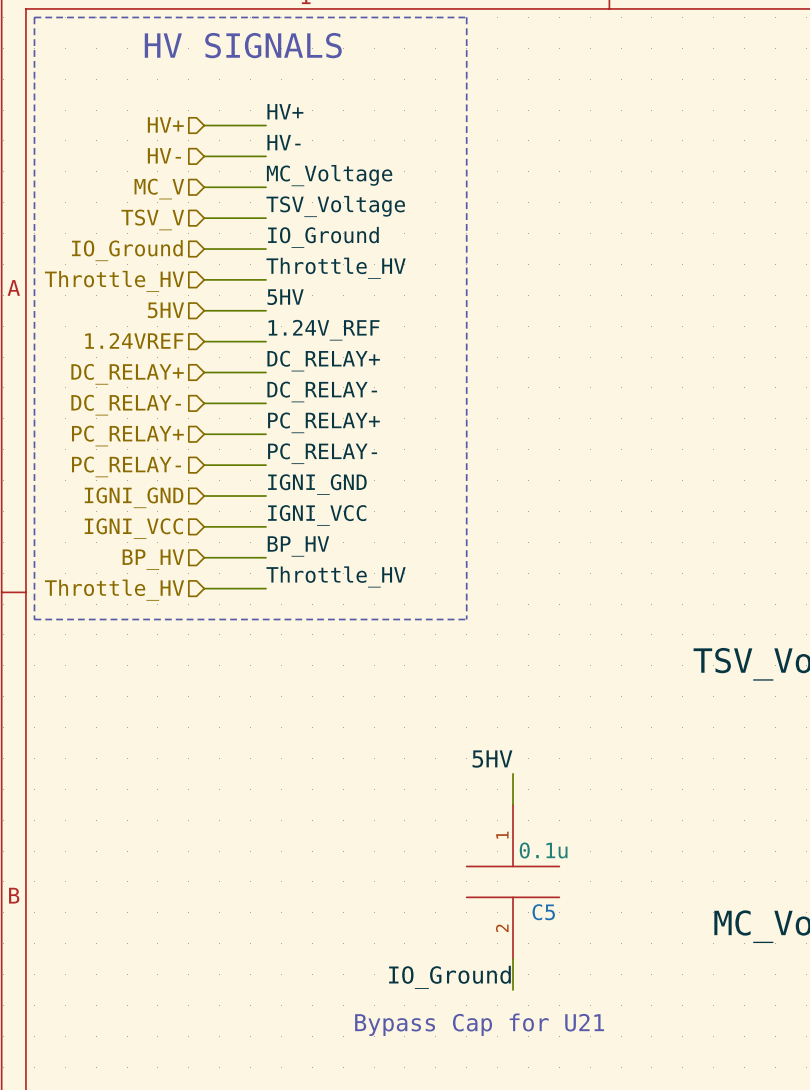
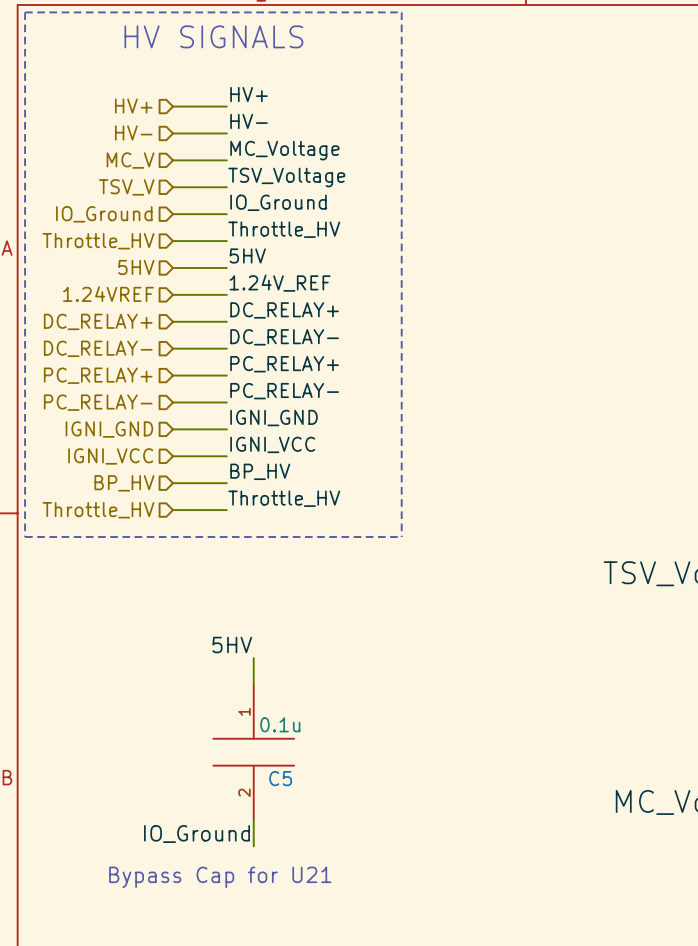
label position: 5HV (492, 759) -> 5HV (232, 645)
wire: (513, 773) (513, 804) -> (253, 658) (253, 684)
C5 position: (513, 881) -> (253, 752)
wire: (513, 959) (513, 989) -> (253, 819) (253, 846)
label position: IO_Ground (449, 977) -> IO_Ground (197, 834)
text position: Bypass Cap for U21 (479, 1024) -> Bypass Cap for U21 (220, 877)

